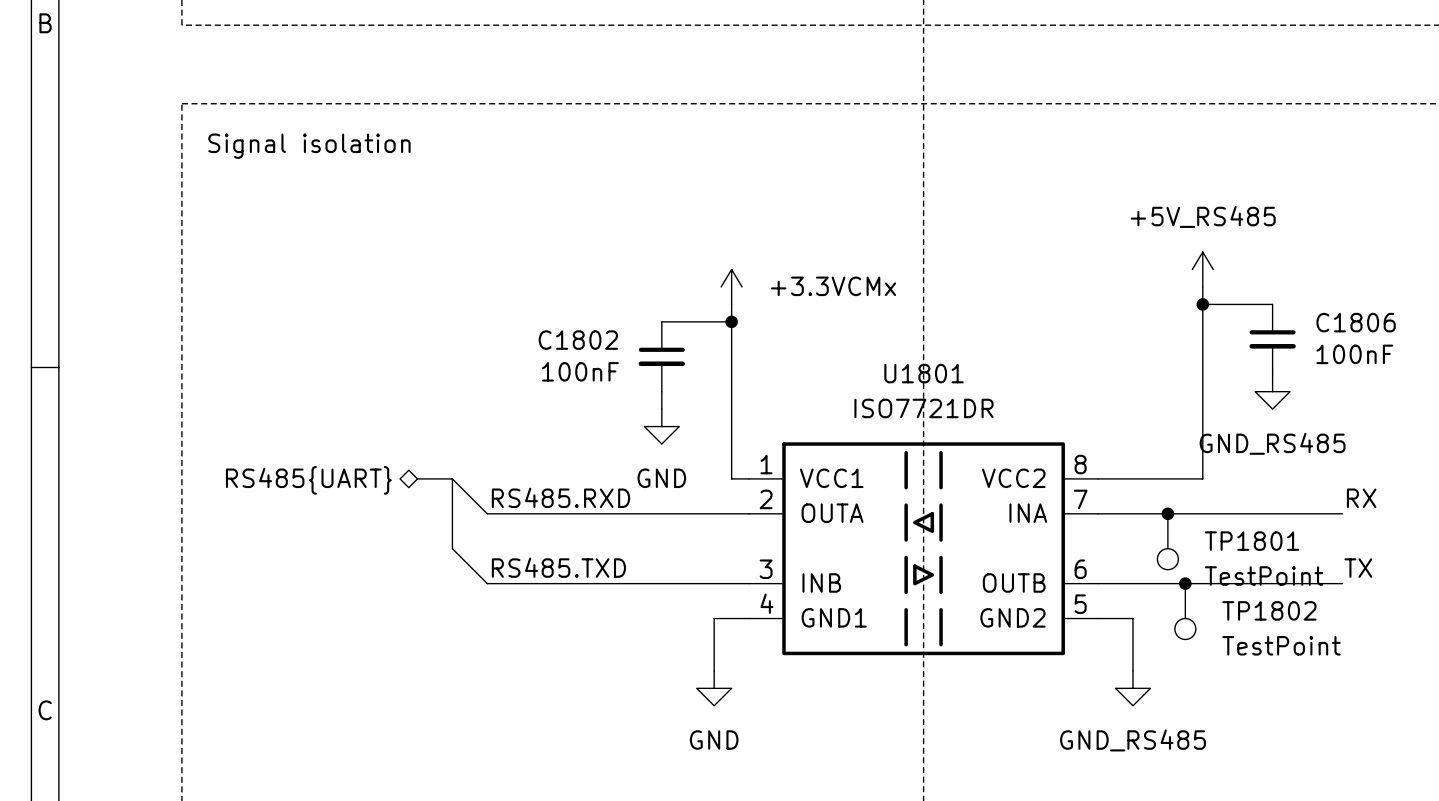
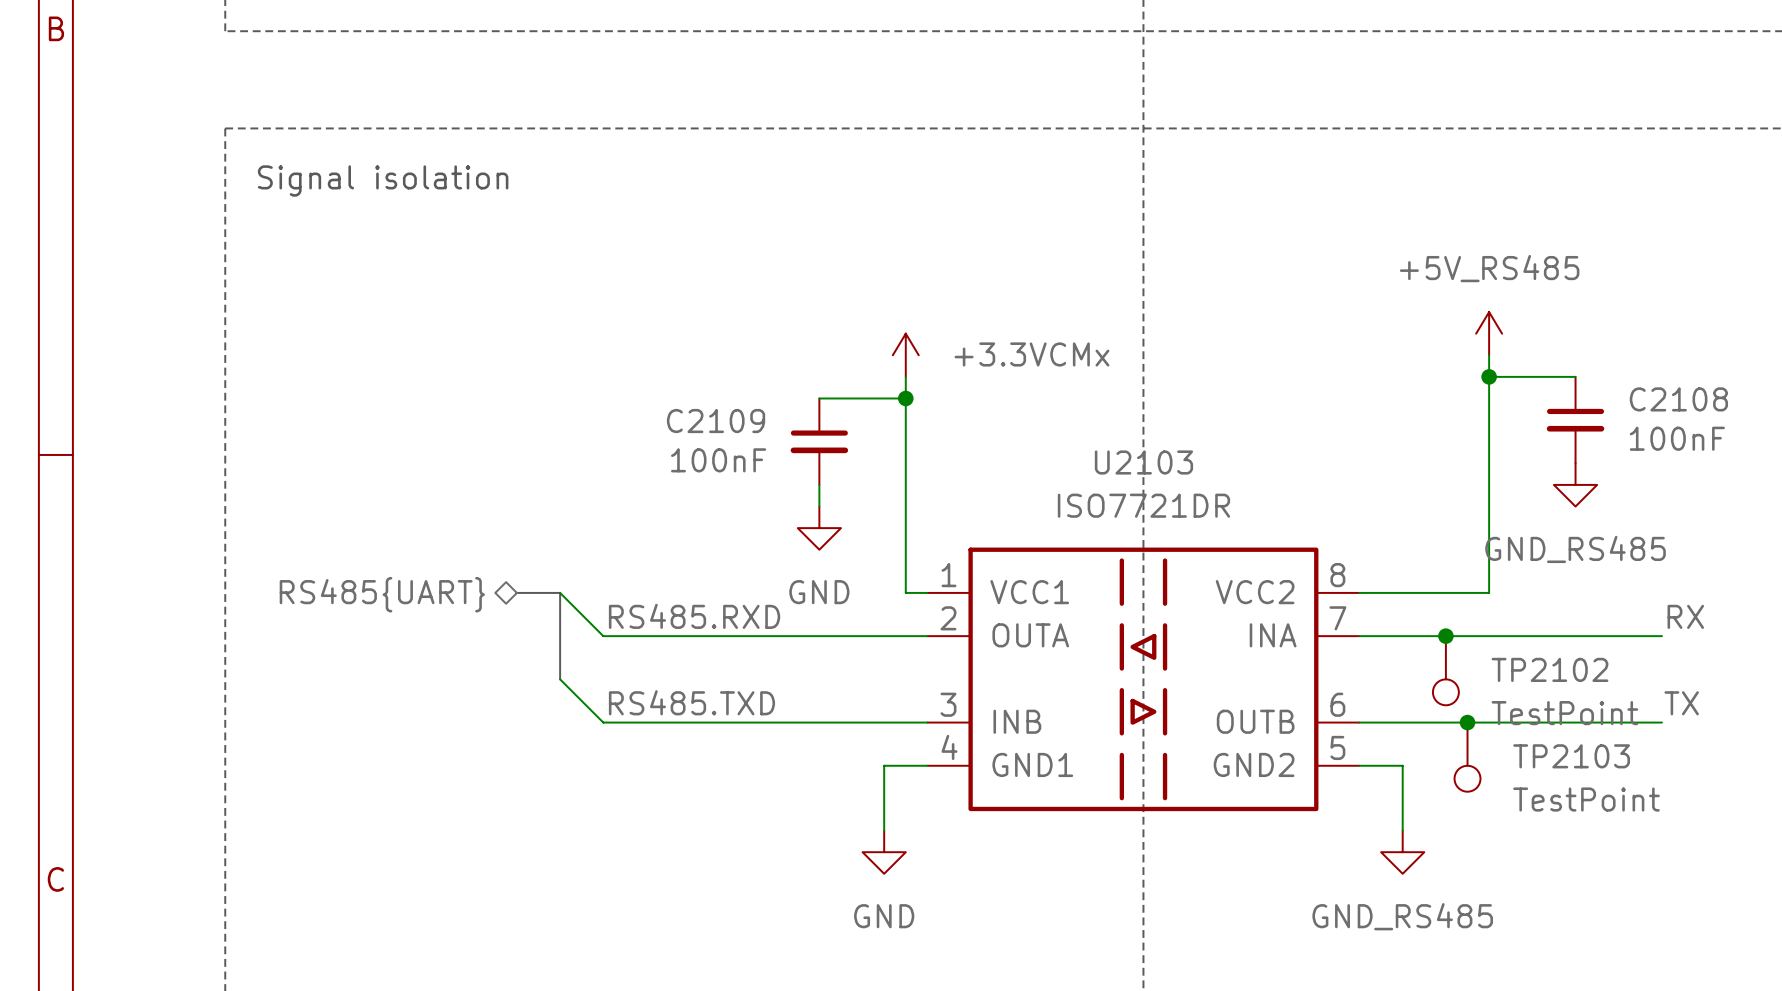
C1806 name: C1806 (1356, 322) -> C2108 (1678, 399)
C1802 name: C1802 (578, 340) -> C2109 (716, 421)
U1801 name: U1801 (924, 373) -> U2103 (1143, 462)
TP1801 name: TP1801 (1251, 541) -> TP2102 (1549, 669)
TP1802 name: TP1802 (1269, 610) -> TP2103 (1571, 756)

